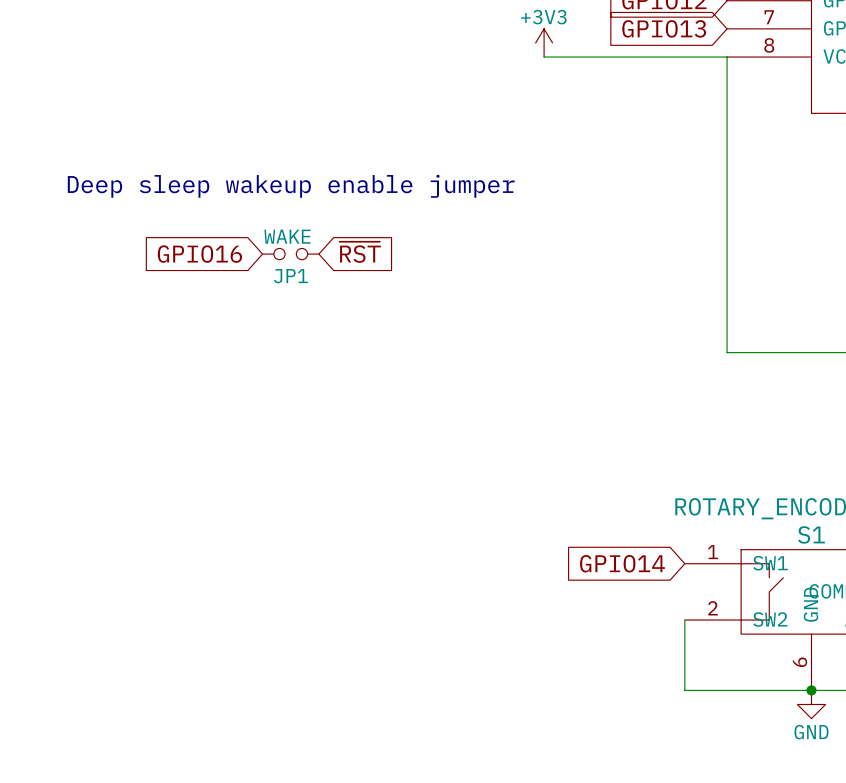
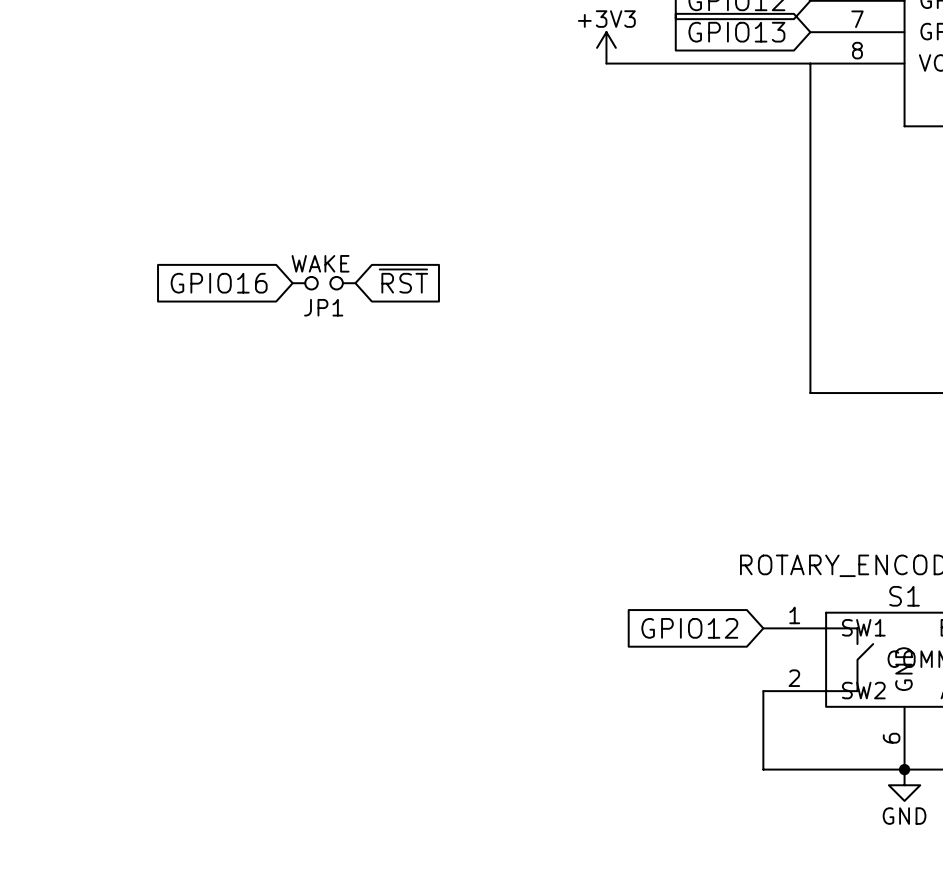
text: Deep sleep wakeup enable jumper (291, 186) -> none
global label: GPIO14 (622, 563) -> GPIO12 (689, 628)

